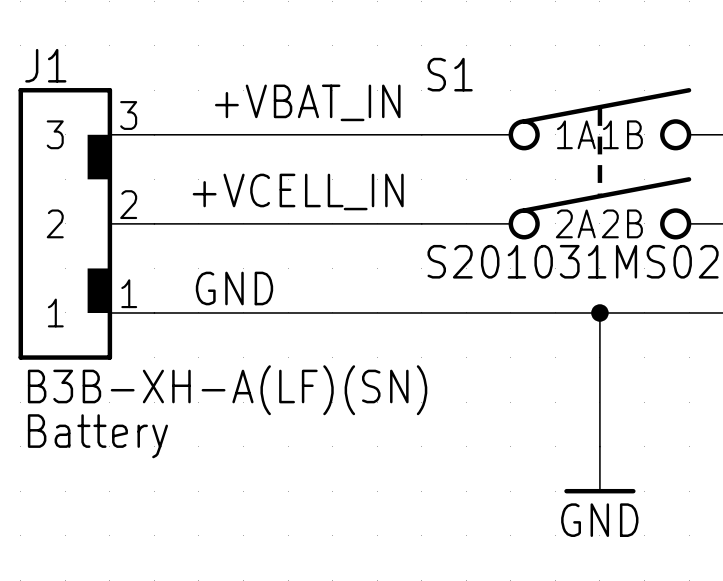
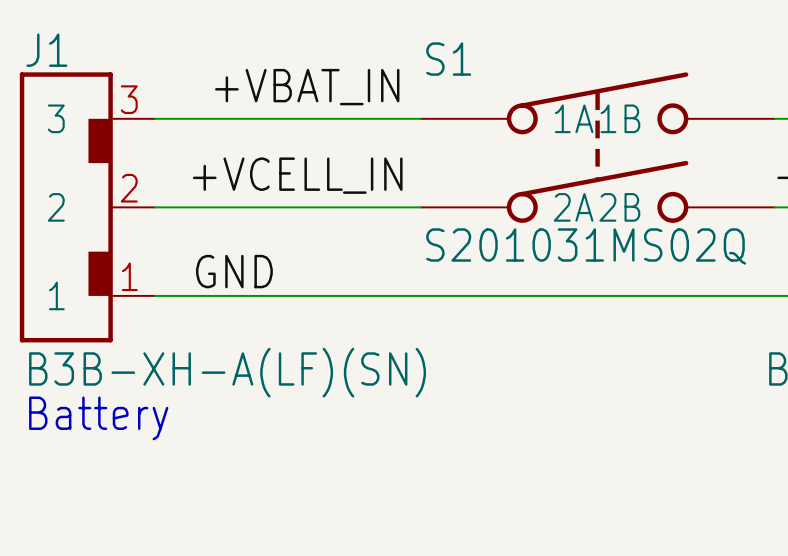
wire: (599, 312) (599, 446) -> none
junction: (599, 312) -> none
power symbol: GND (599, 470) -> none

